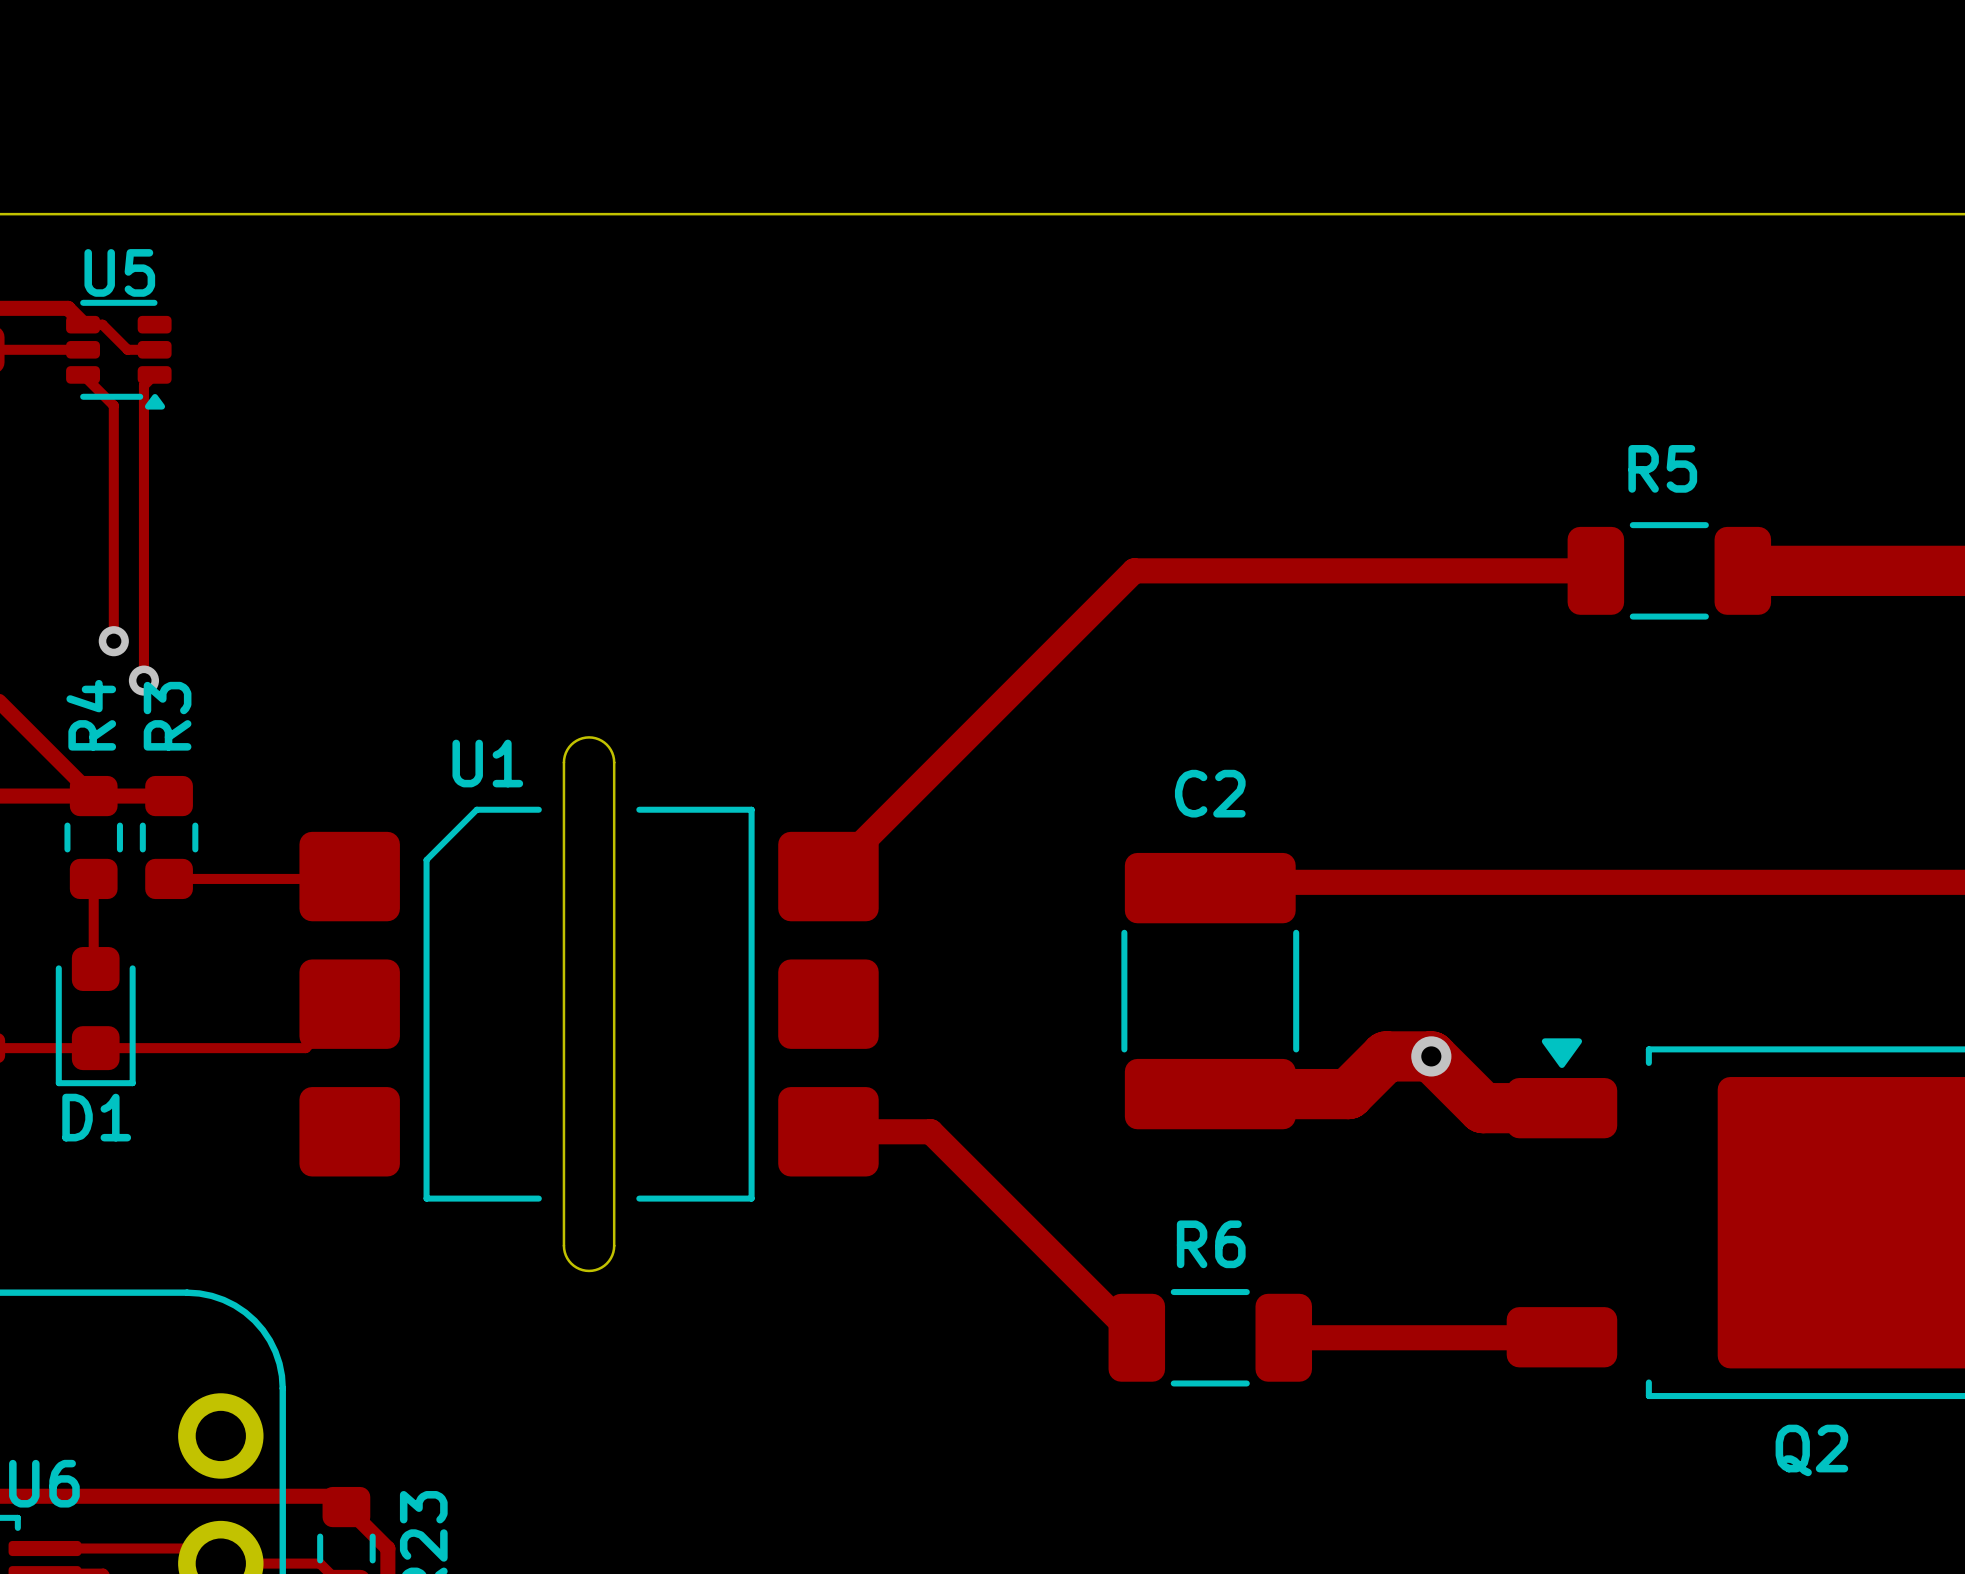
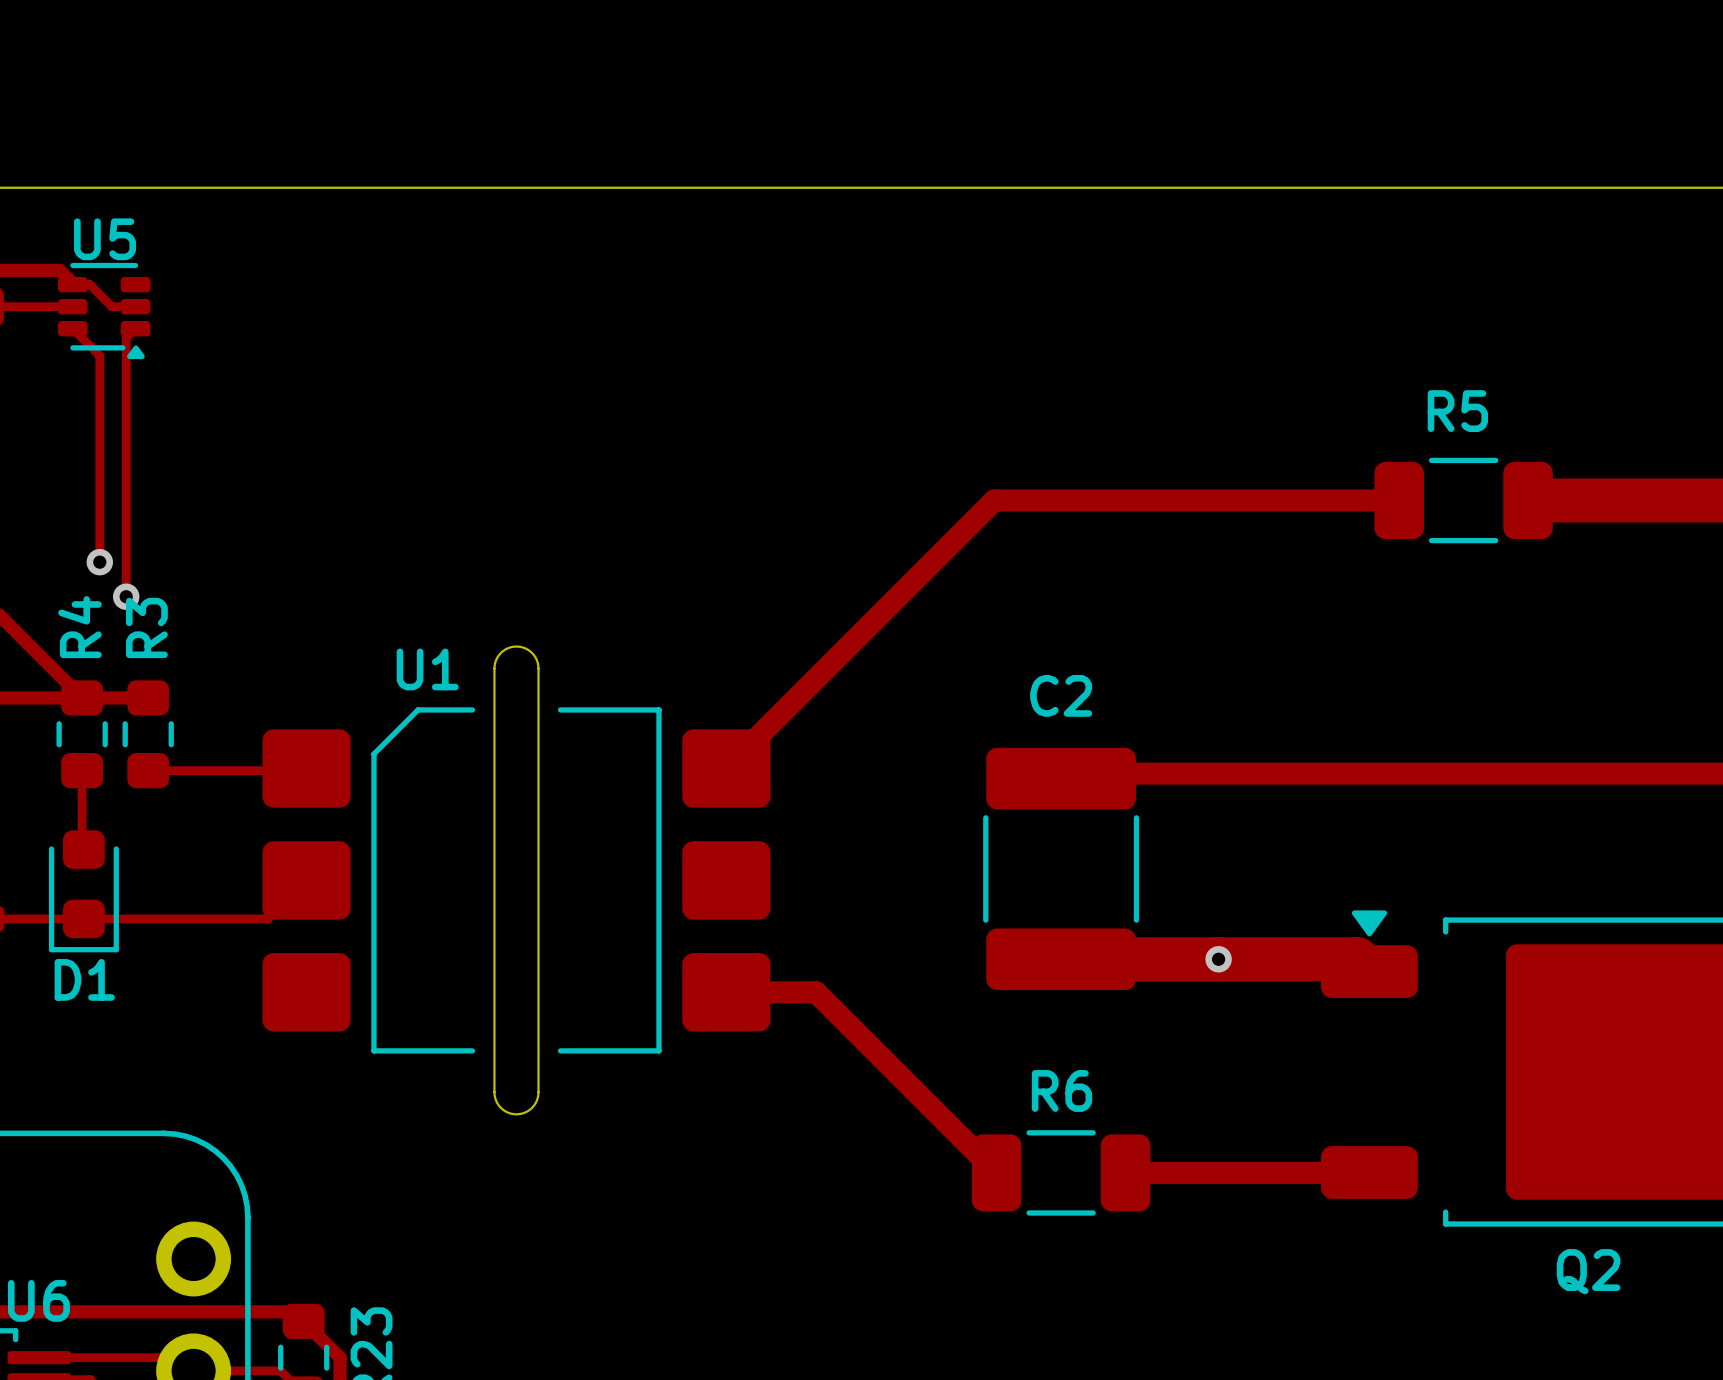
via: (1431, 1056) -> none
track: (1348, 1094) (1386, 1056) (1431, 1056) (1483, 1108) (1561, 1108) -> (1182, 959) (1357, 959) (1369, 971)
via: none -> (1218, 959)

